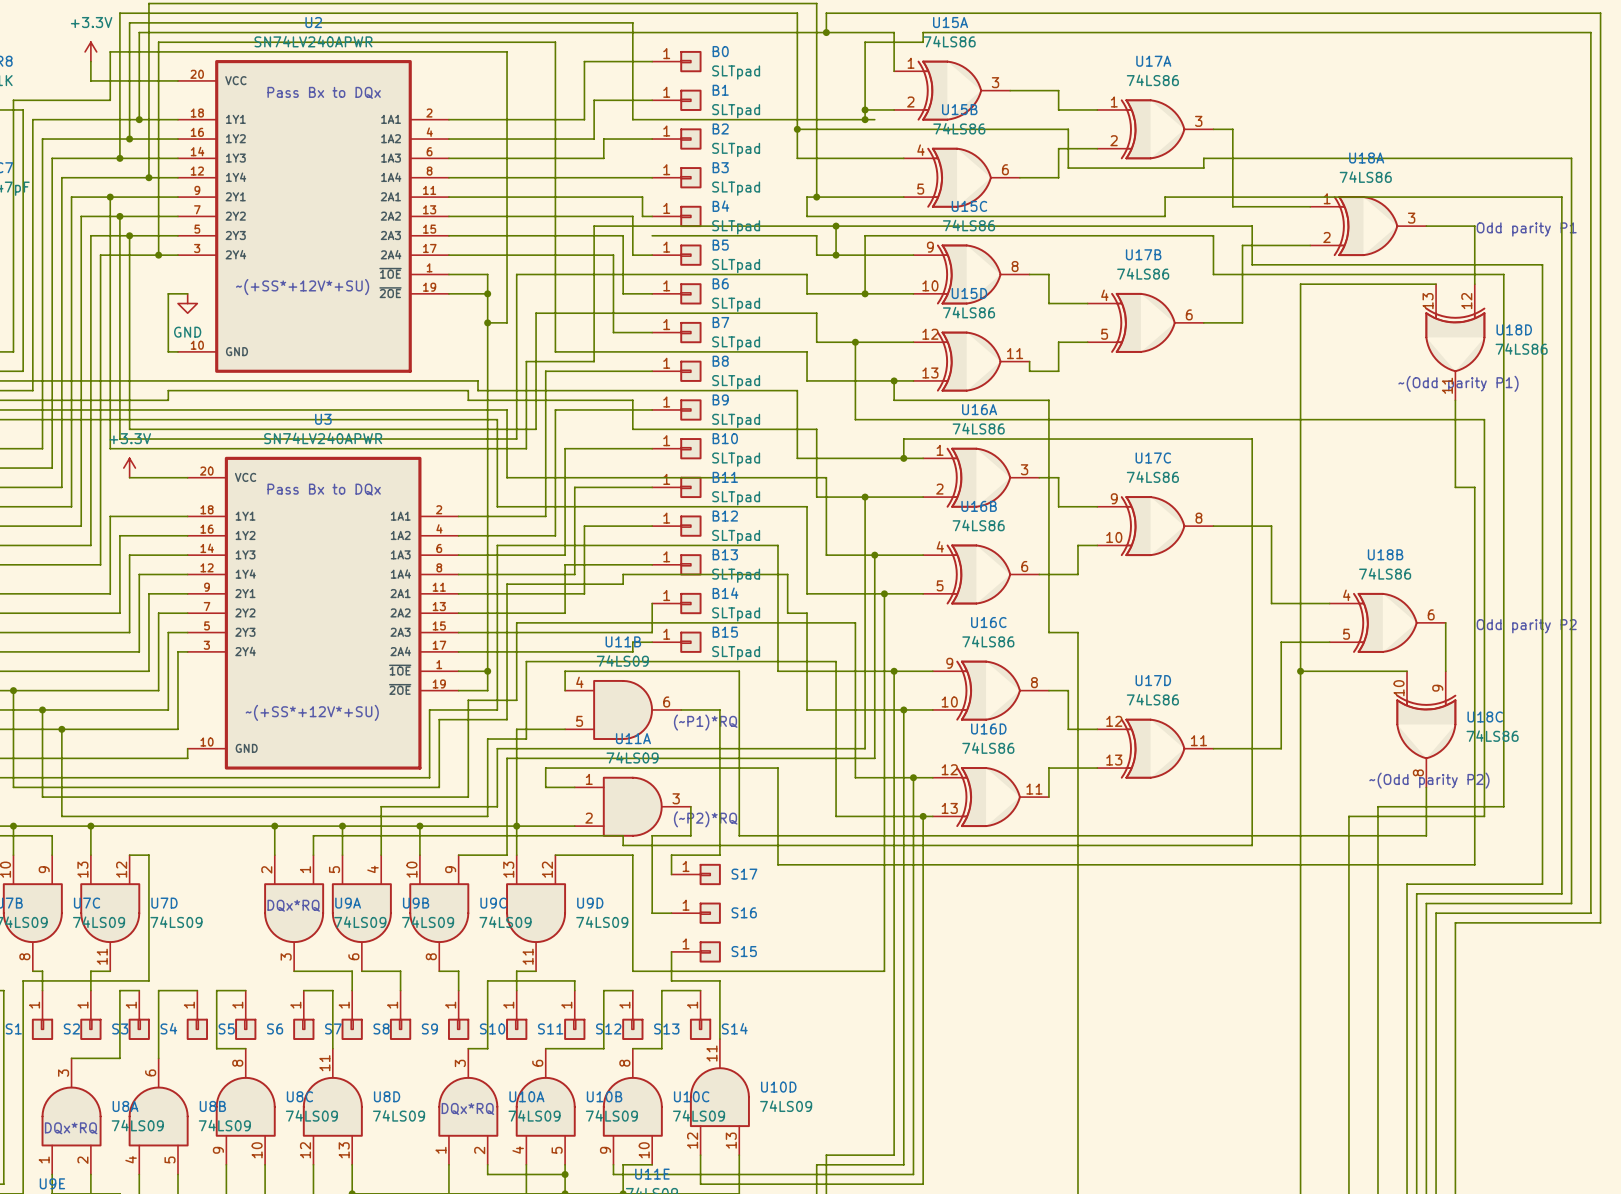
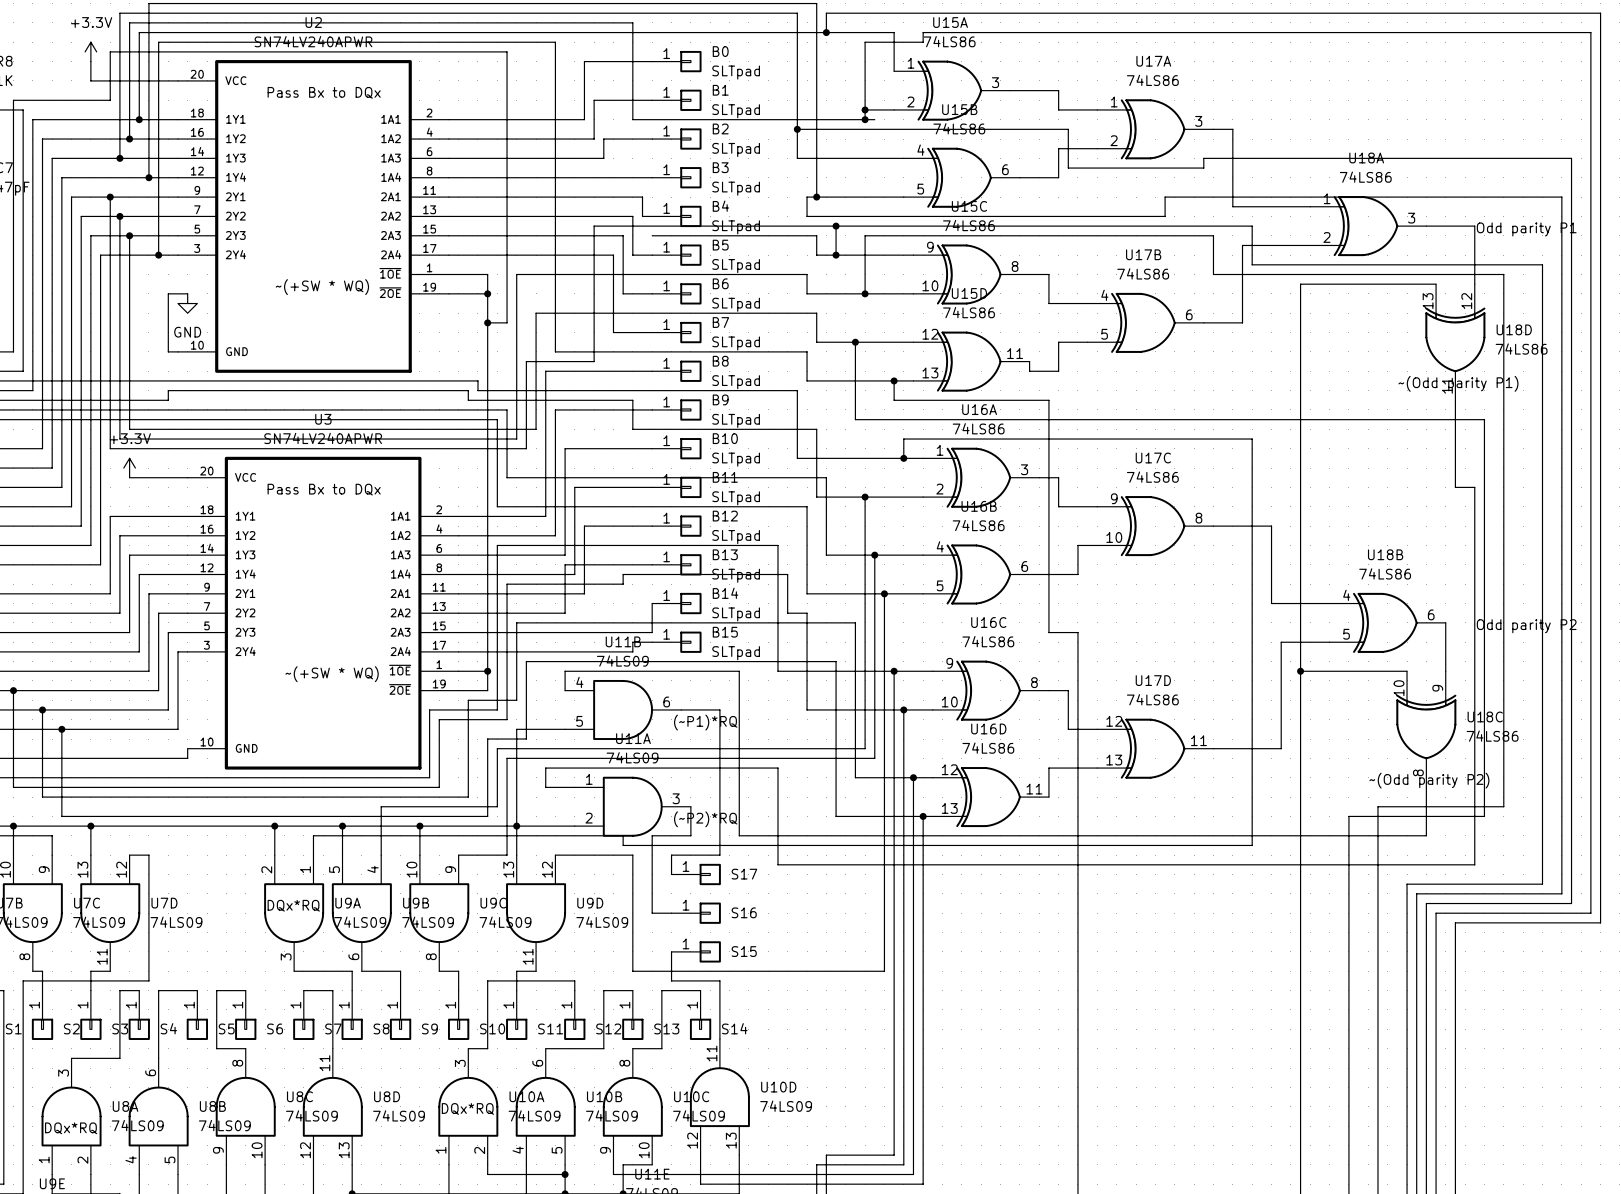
text: ~(+SS*+12V*+SU) (302, 287) -> ~(+SW * WQ) (322, 287)
text: none -> ~(+SW * WQ) (332, 674)
text: ~(+SS*+12V*+SU) (312, 712) -> none

